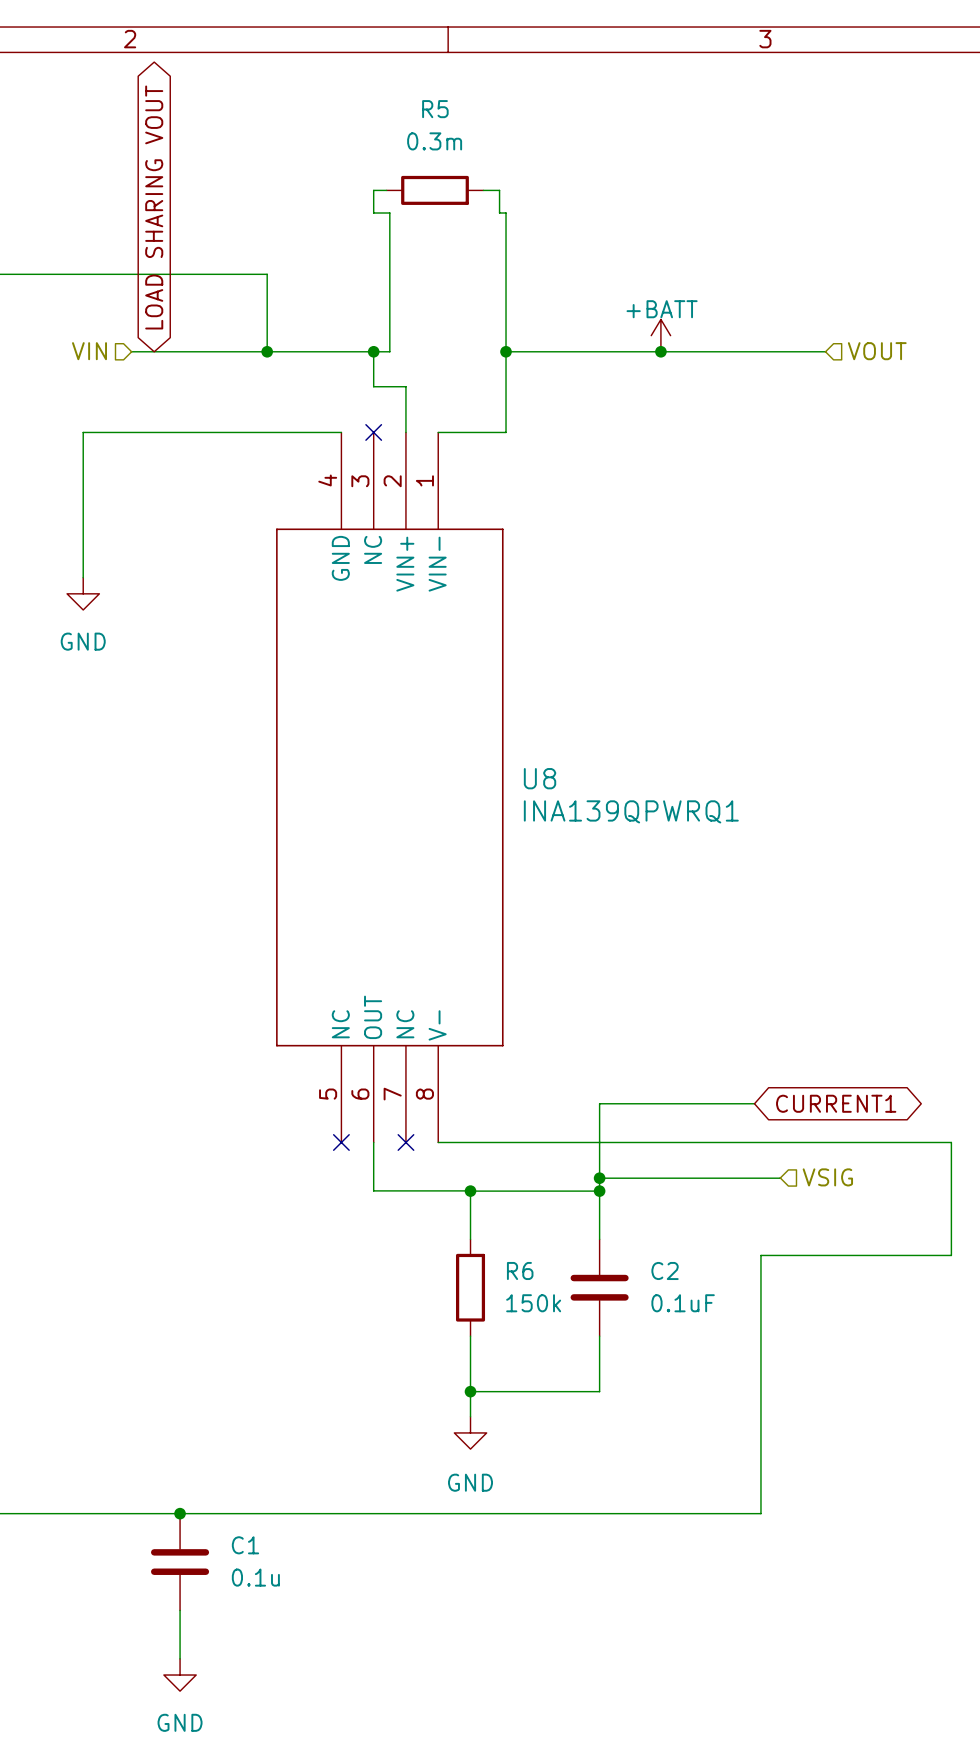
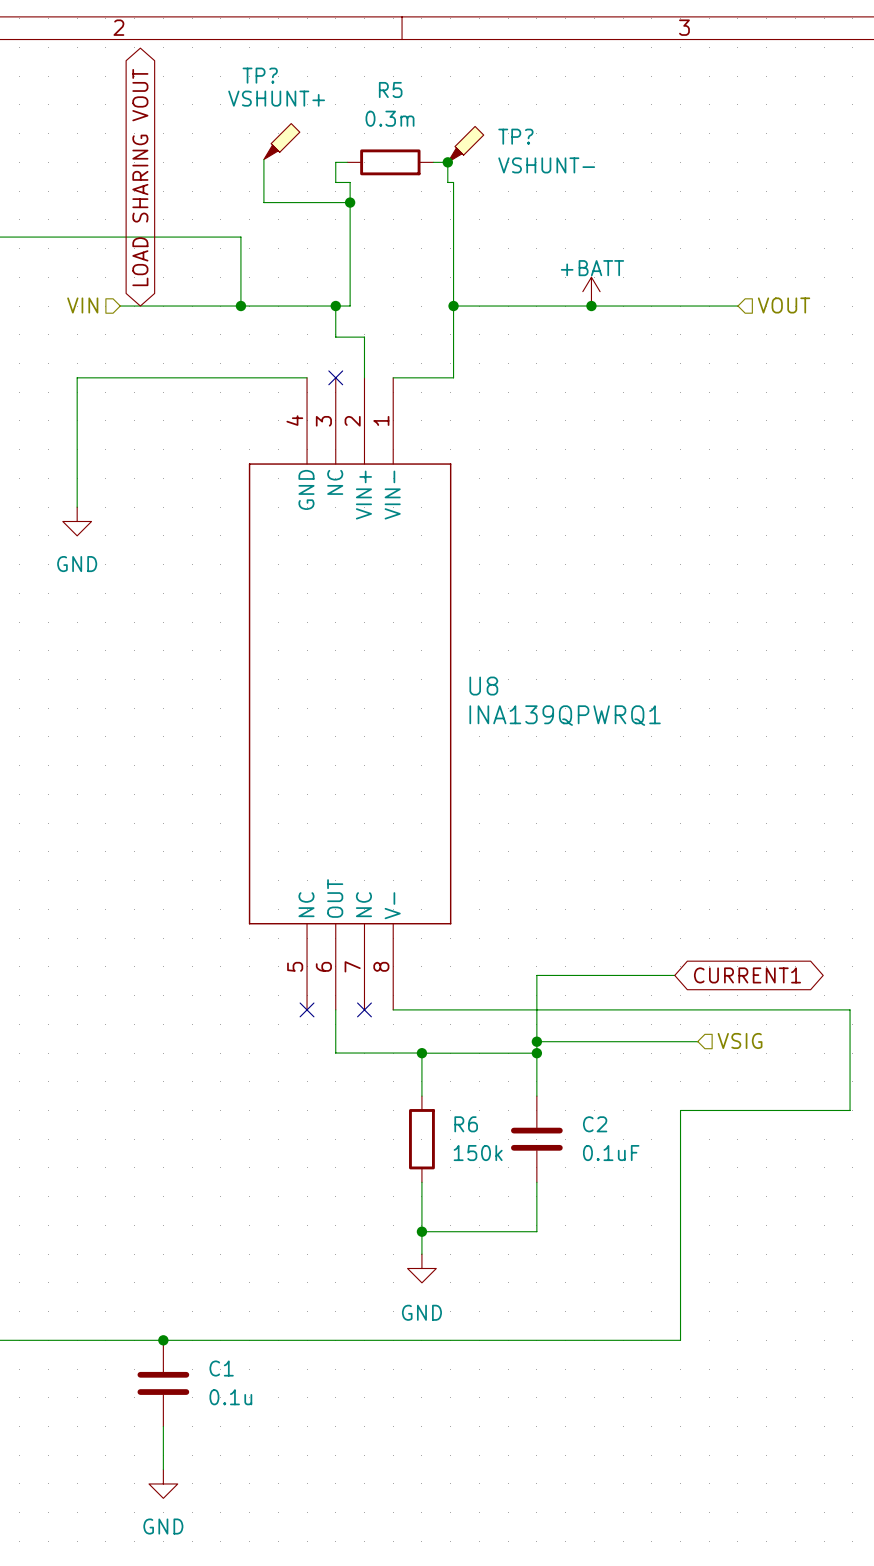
TP?: none -> VSHUNT+ (281, 141)
TP?: none -> VSHUNT- (465, 144)
wire: none -> (263, 159) (263, 202) (350, 202)
junction: none -> (447, 162)
junction: none -> (350, 202)

